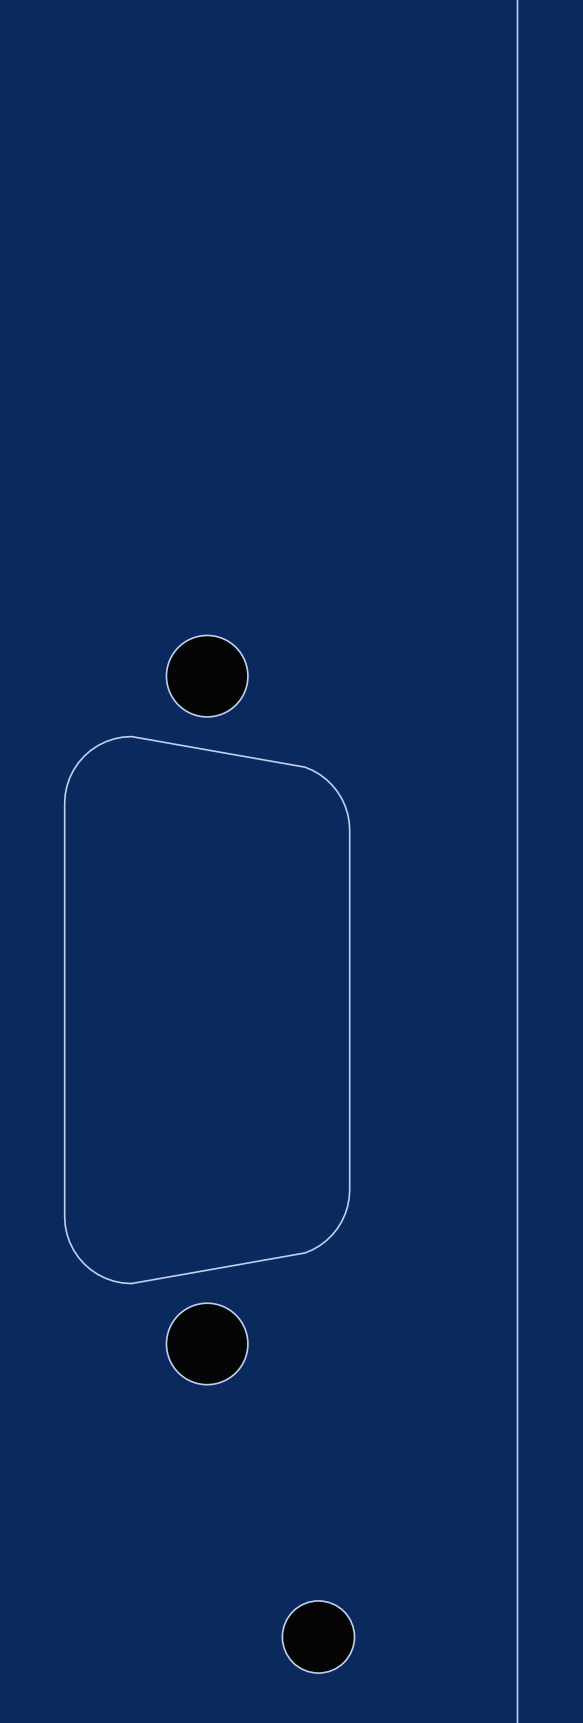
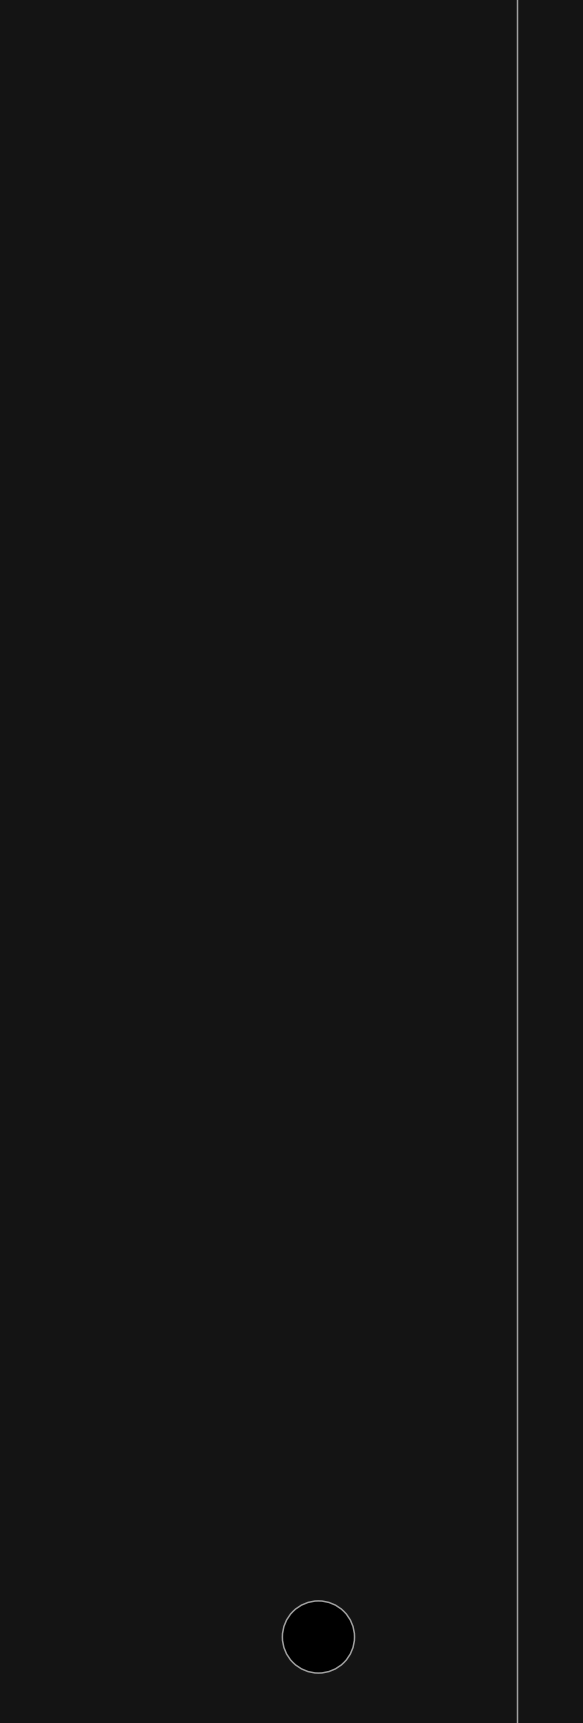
part: (207, 1010) -> none

